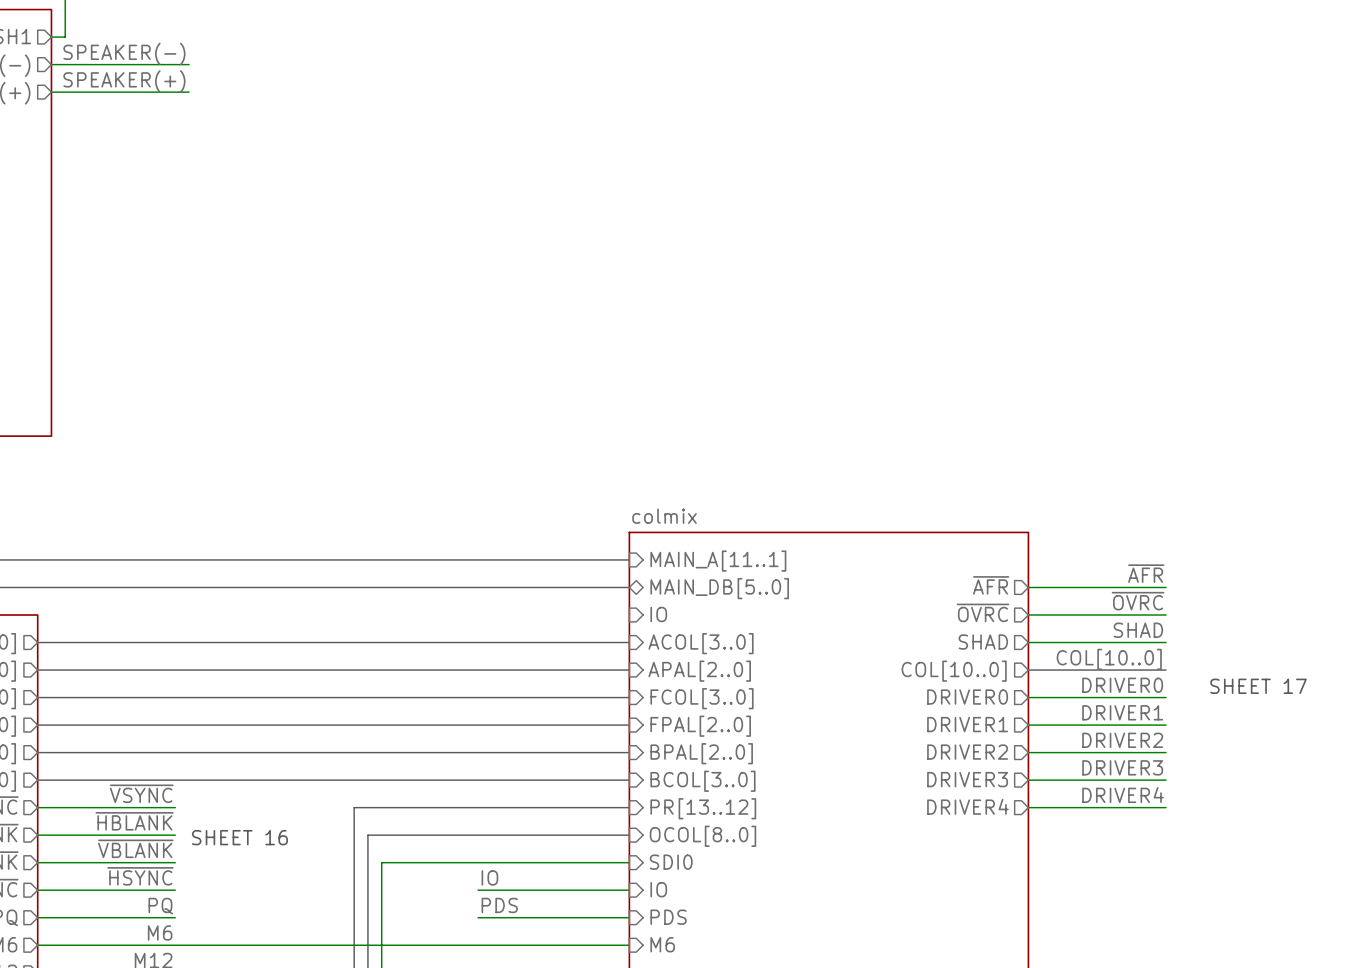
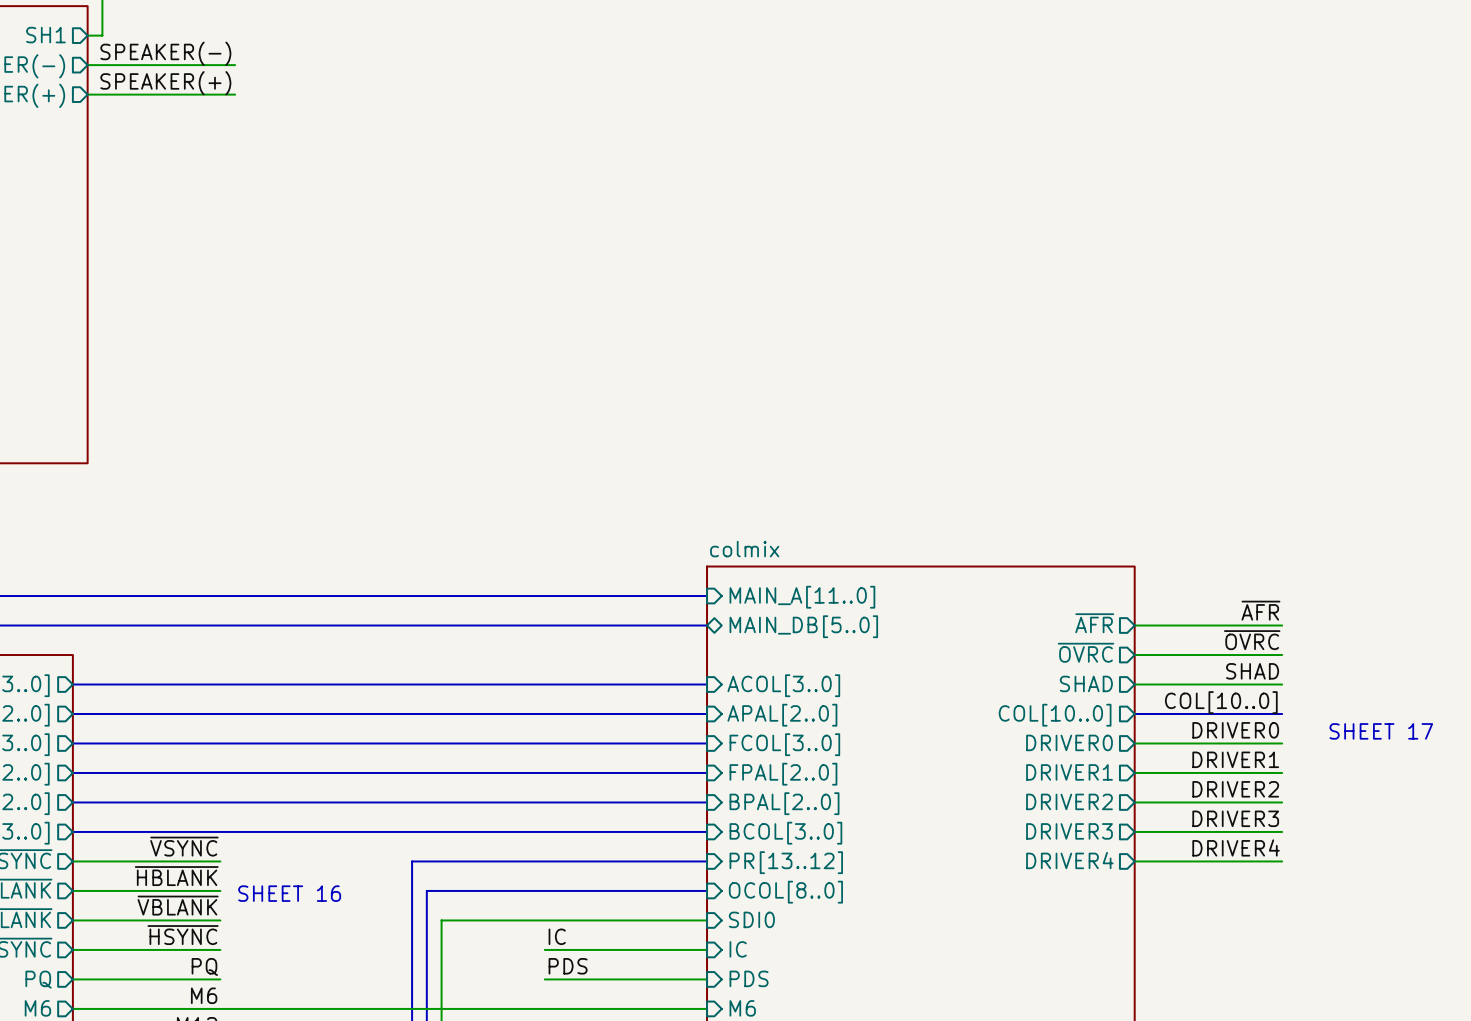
sheet pin: MAIN_A[11..1] (718, 561) -> MAIN_A[11..0] (802, 597)
sheet pin: IO (658, 614) -> none
label: IO (489, 877) -> IC (557, 936)
sheet pin: IO (658, 889) -> IC (738, 949)

